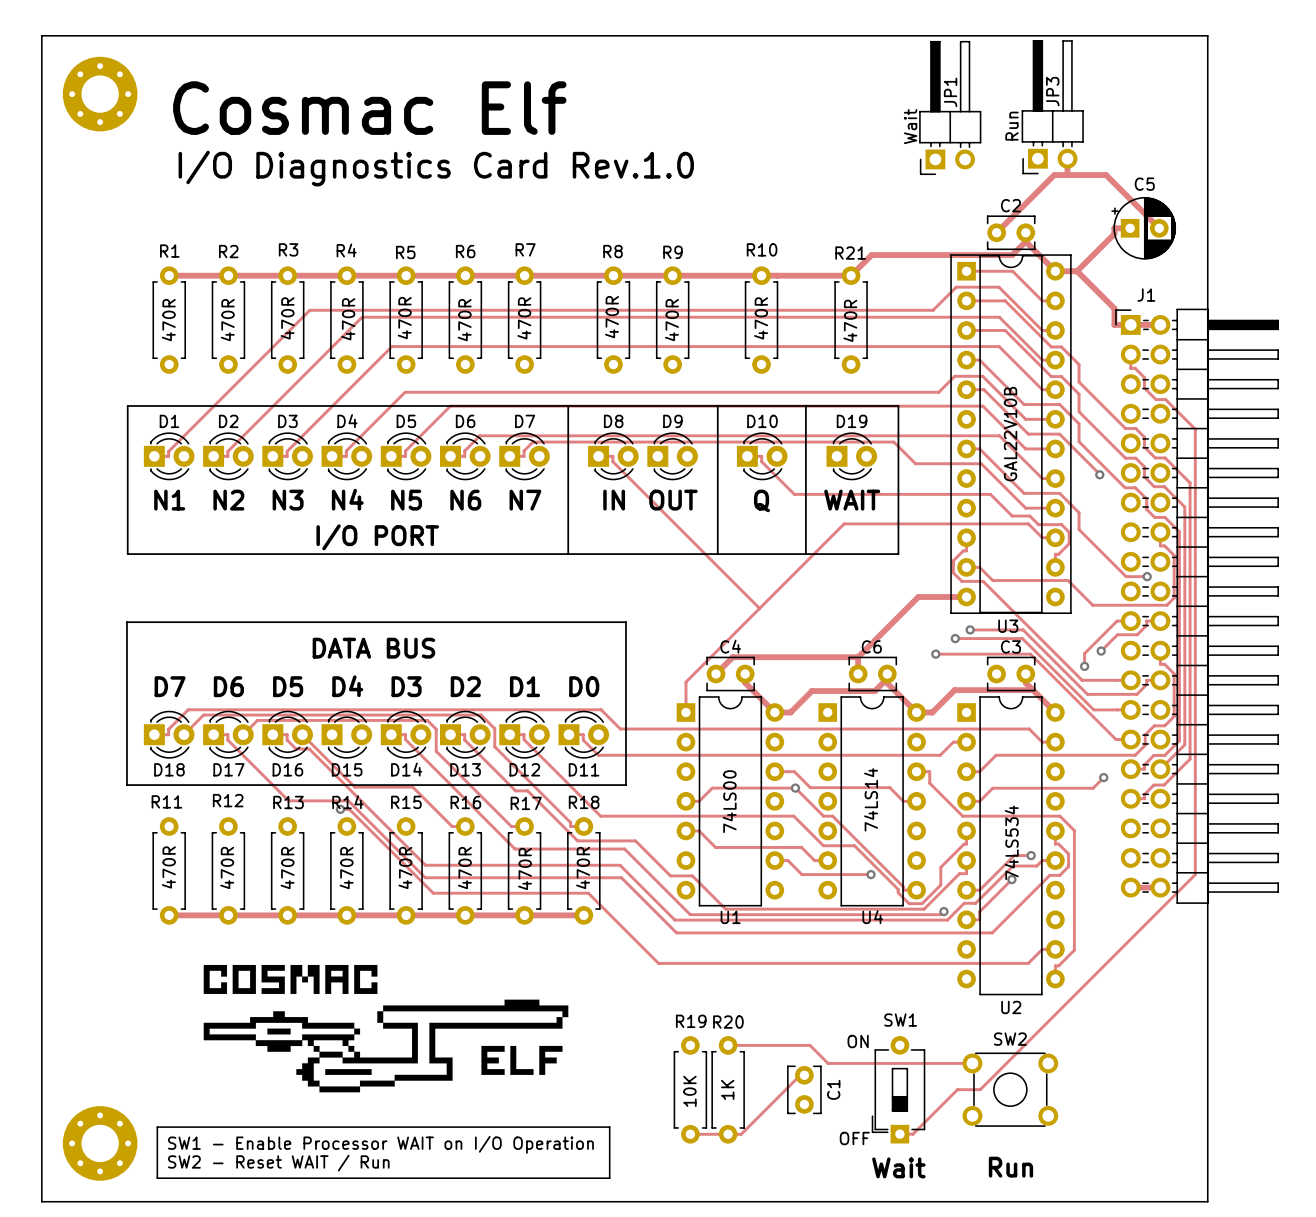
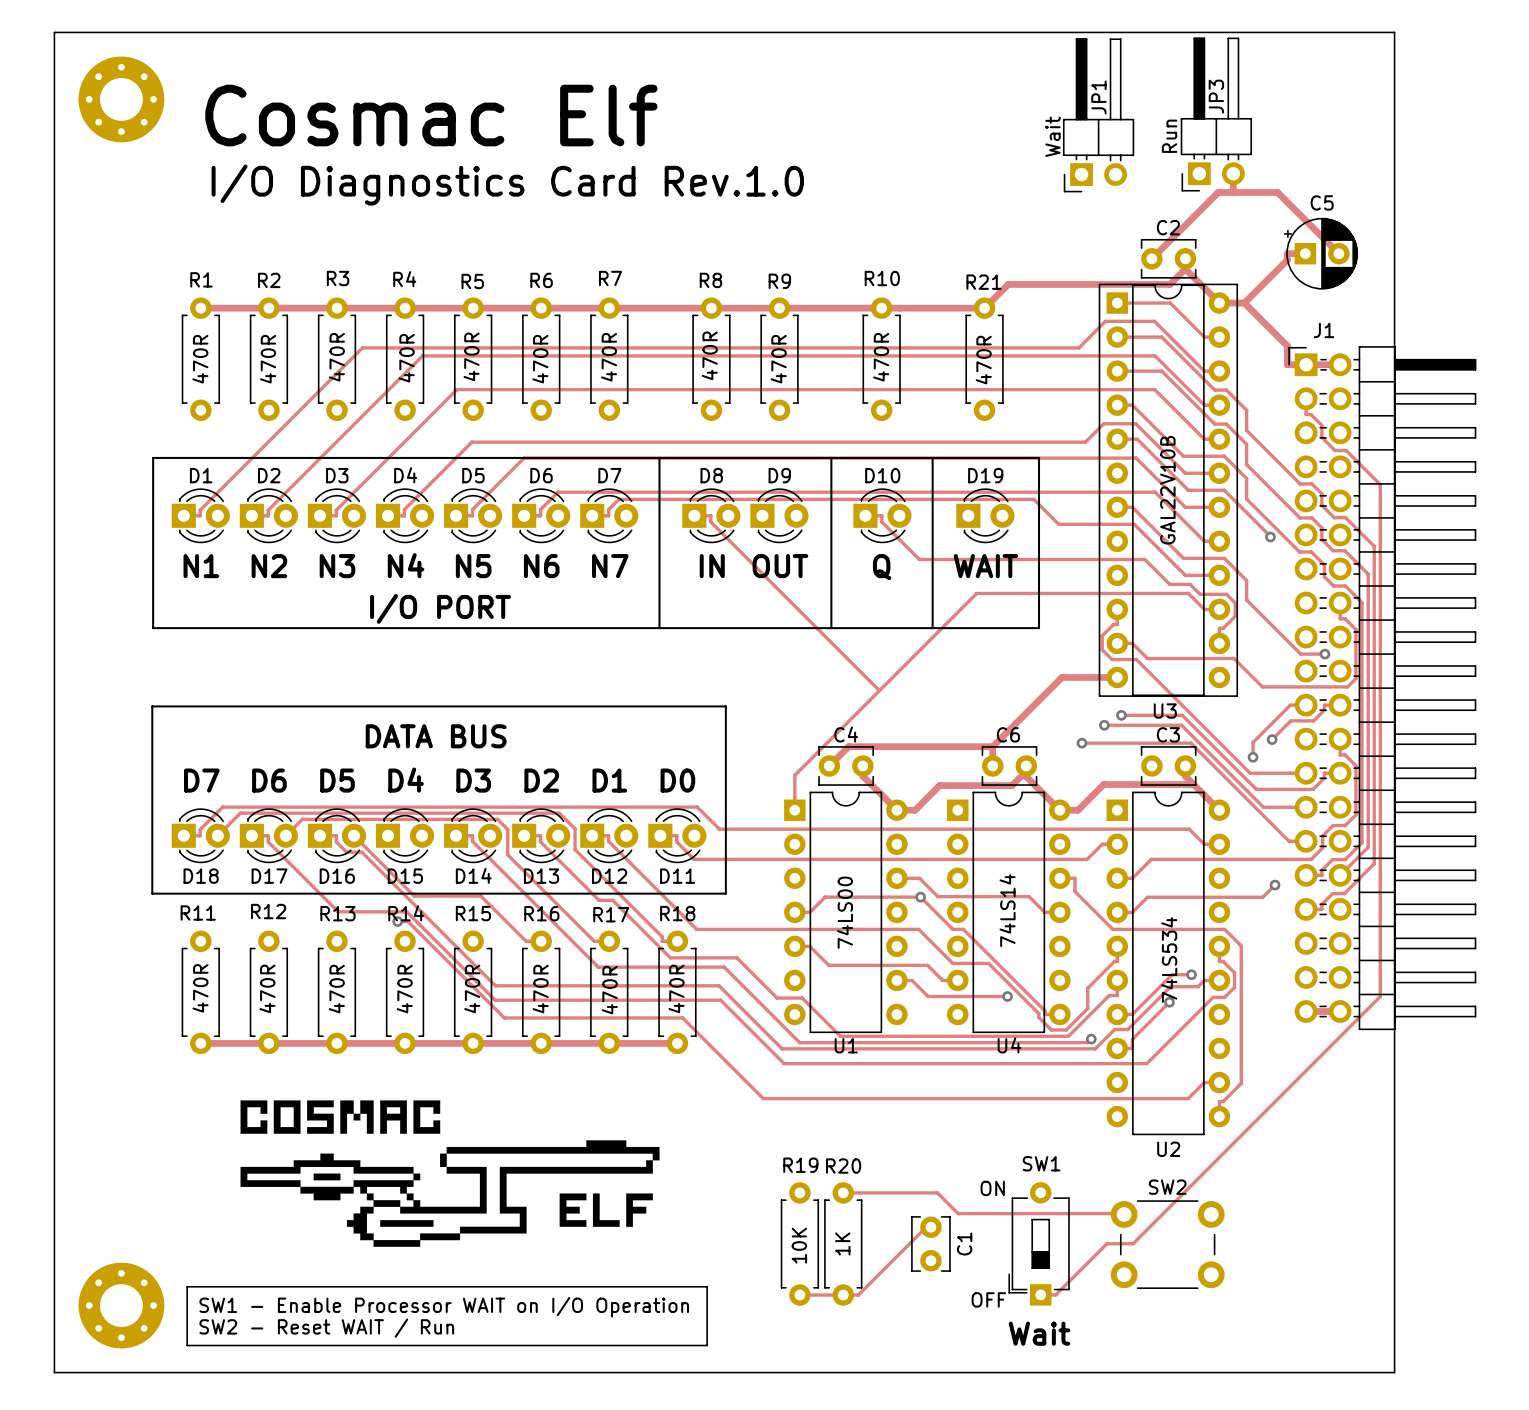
SW2 footprint: [962, 1052, 1059, 1127] -> [1110, 1200, 1225, 1289]
SW2 value: Run (1010, 1167) -> none

